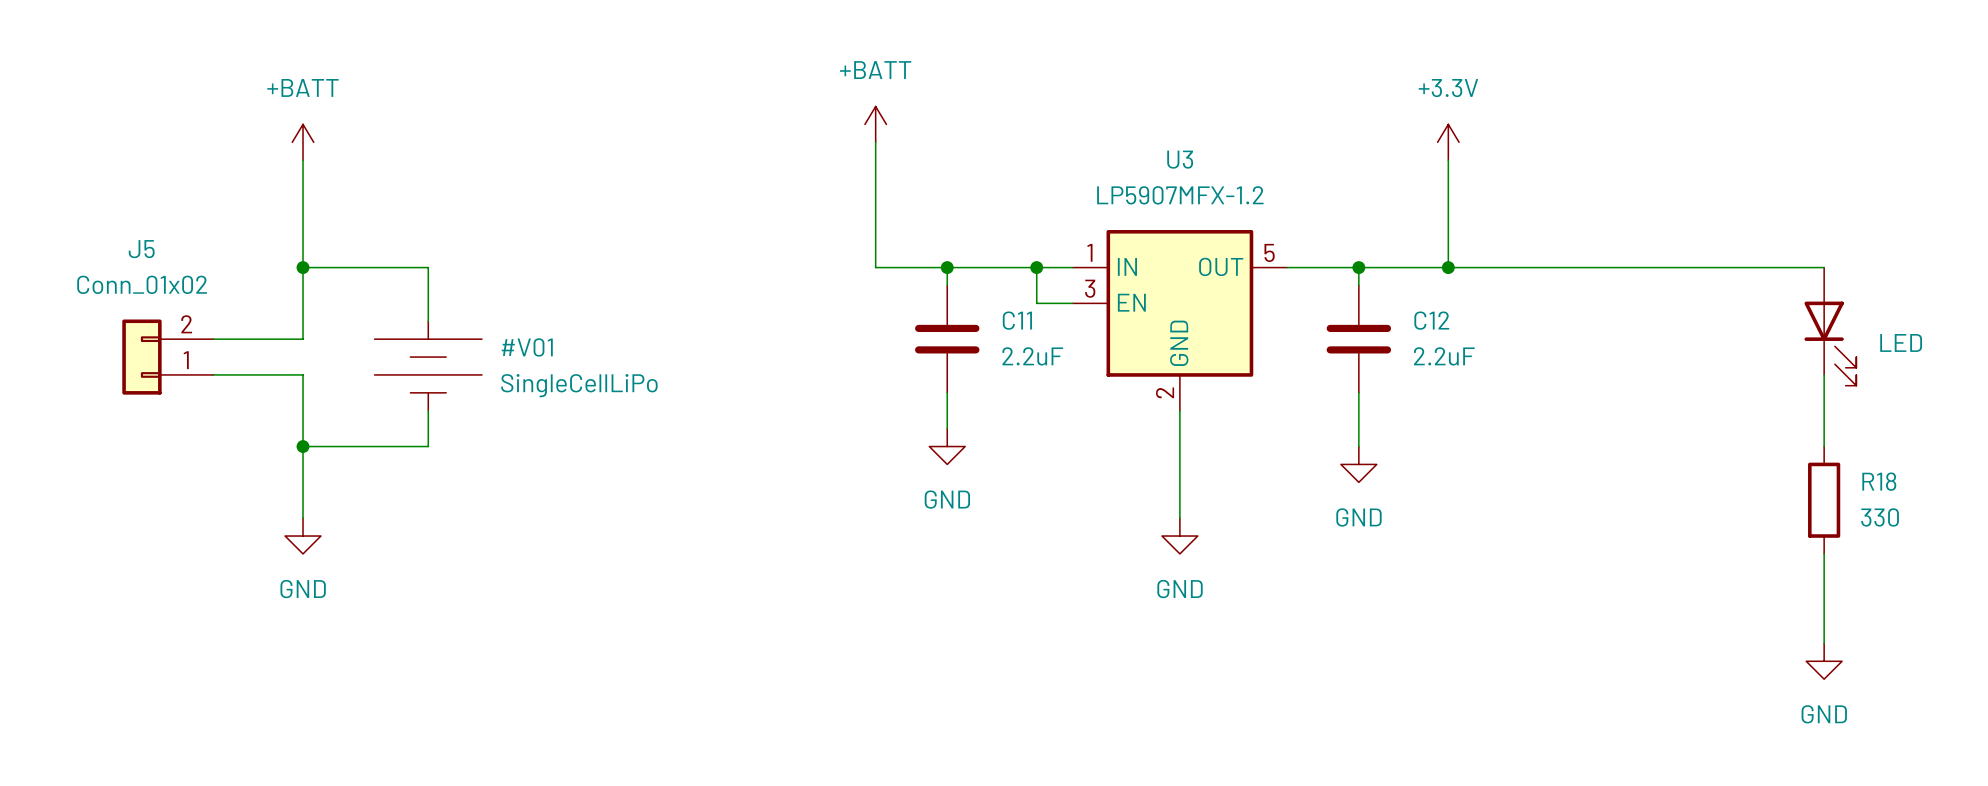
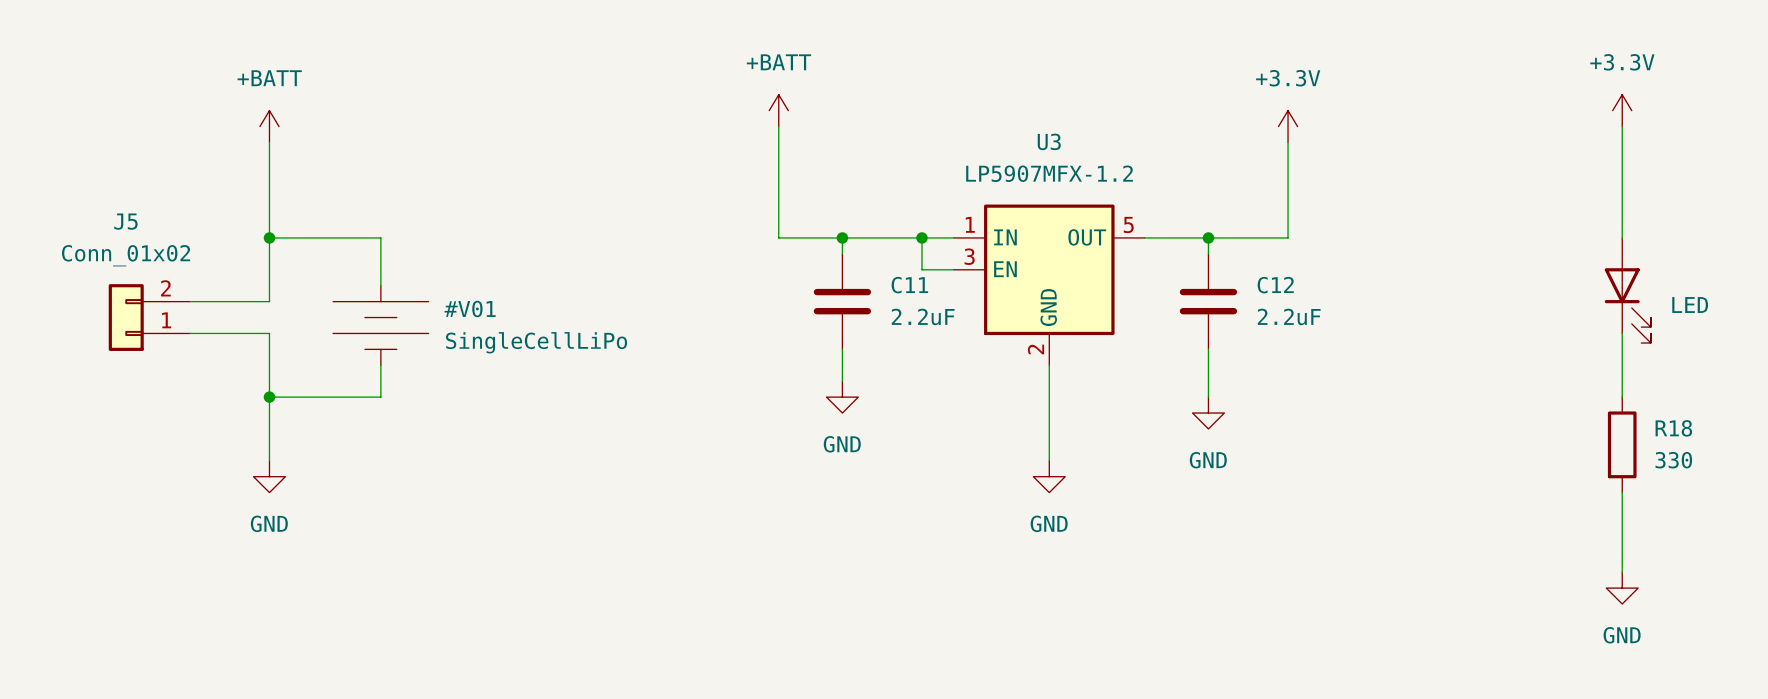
power symbol: none -> +3.3V (1622, 110)
wire: (1448, 267) (1824, 267) -> (1622, 126) (1622, 237)
junction: (1448, 267) -> none

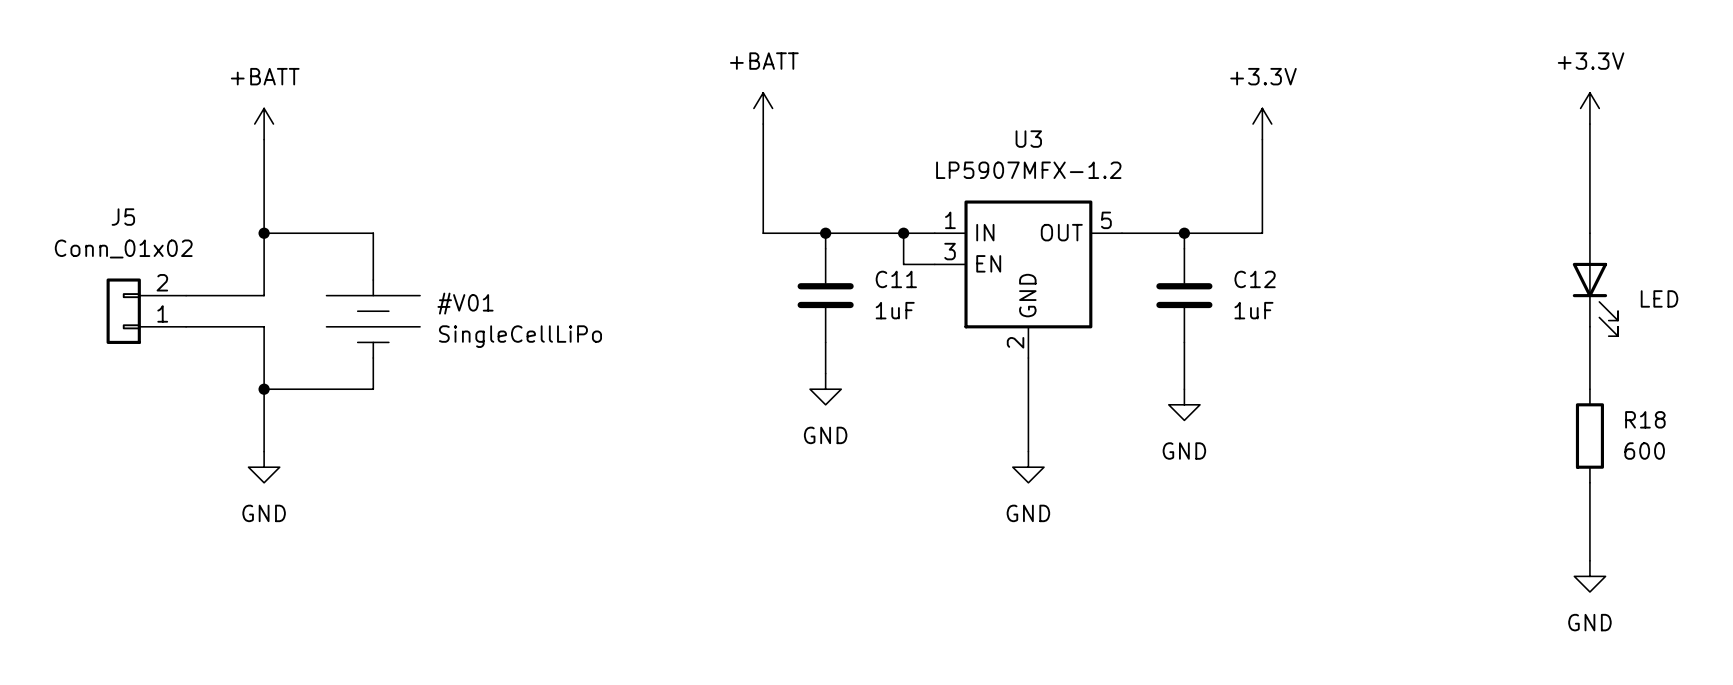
C11 value: 2.2uF (923, 316) -> 1uF (895, 310)
C12 value: 2.2uF (1289, 316) -> 1uF (1253, 310)
R18 value: 330 (1673, 460) -> 600 (1644, 451)

